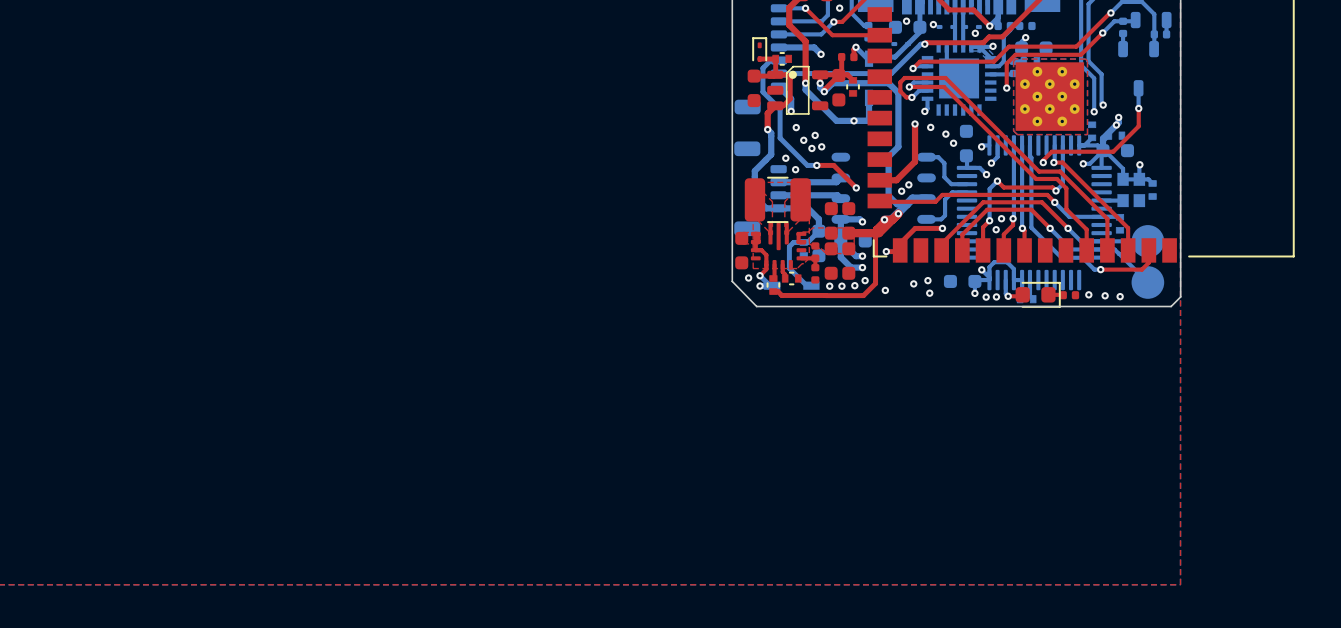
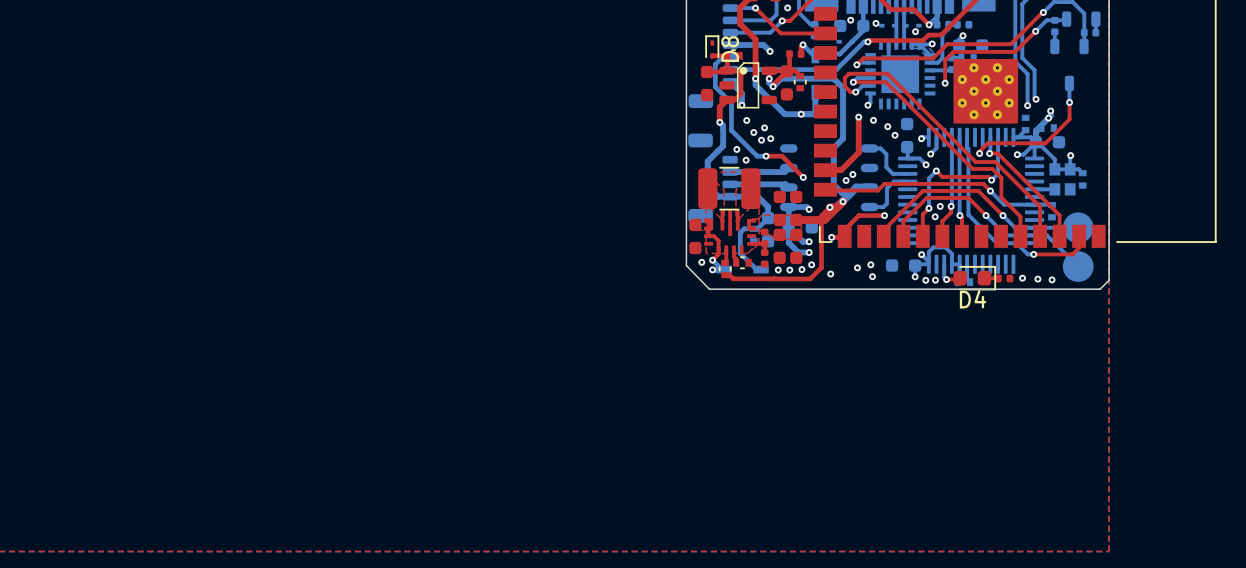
D8 name: none -> D8 (730, 49)
top zone outline: (1015, 59) (1013, 61) (1013, 130) (1017, 134) (1087, 134) (1087, 60) (1085, 59) (1015, 59) -> none
D4 name: none -> D4 (973, 299)

